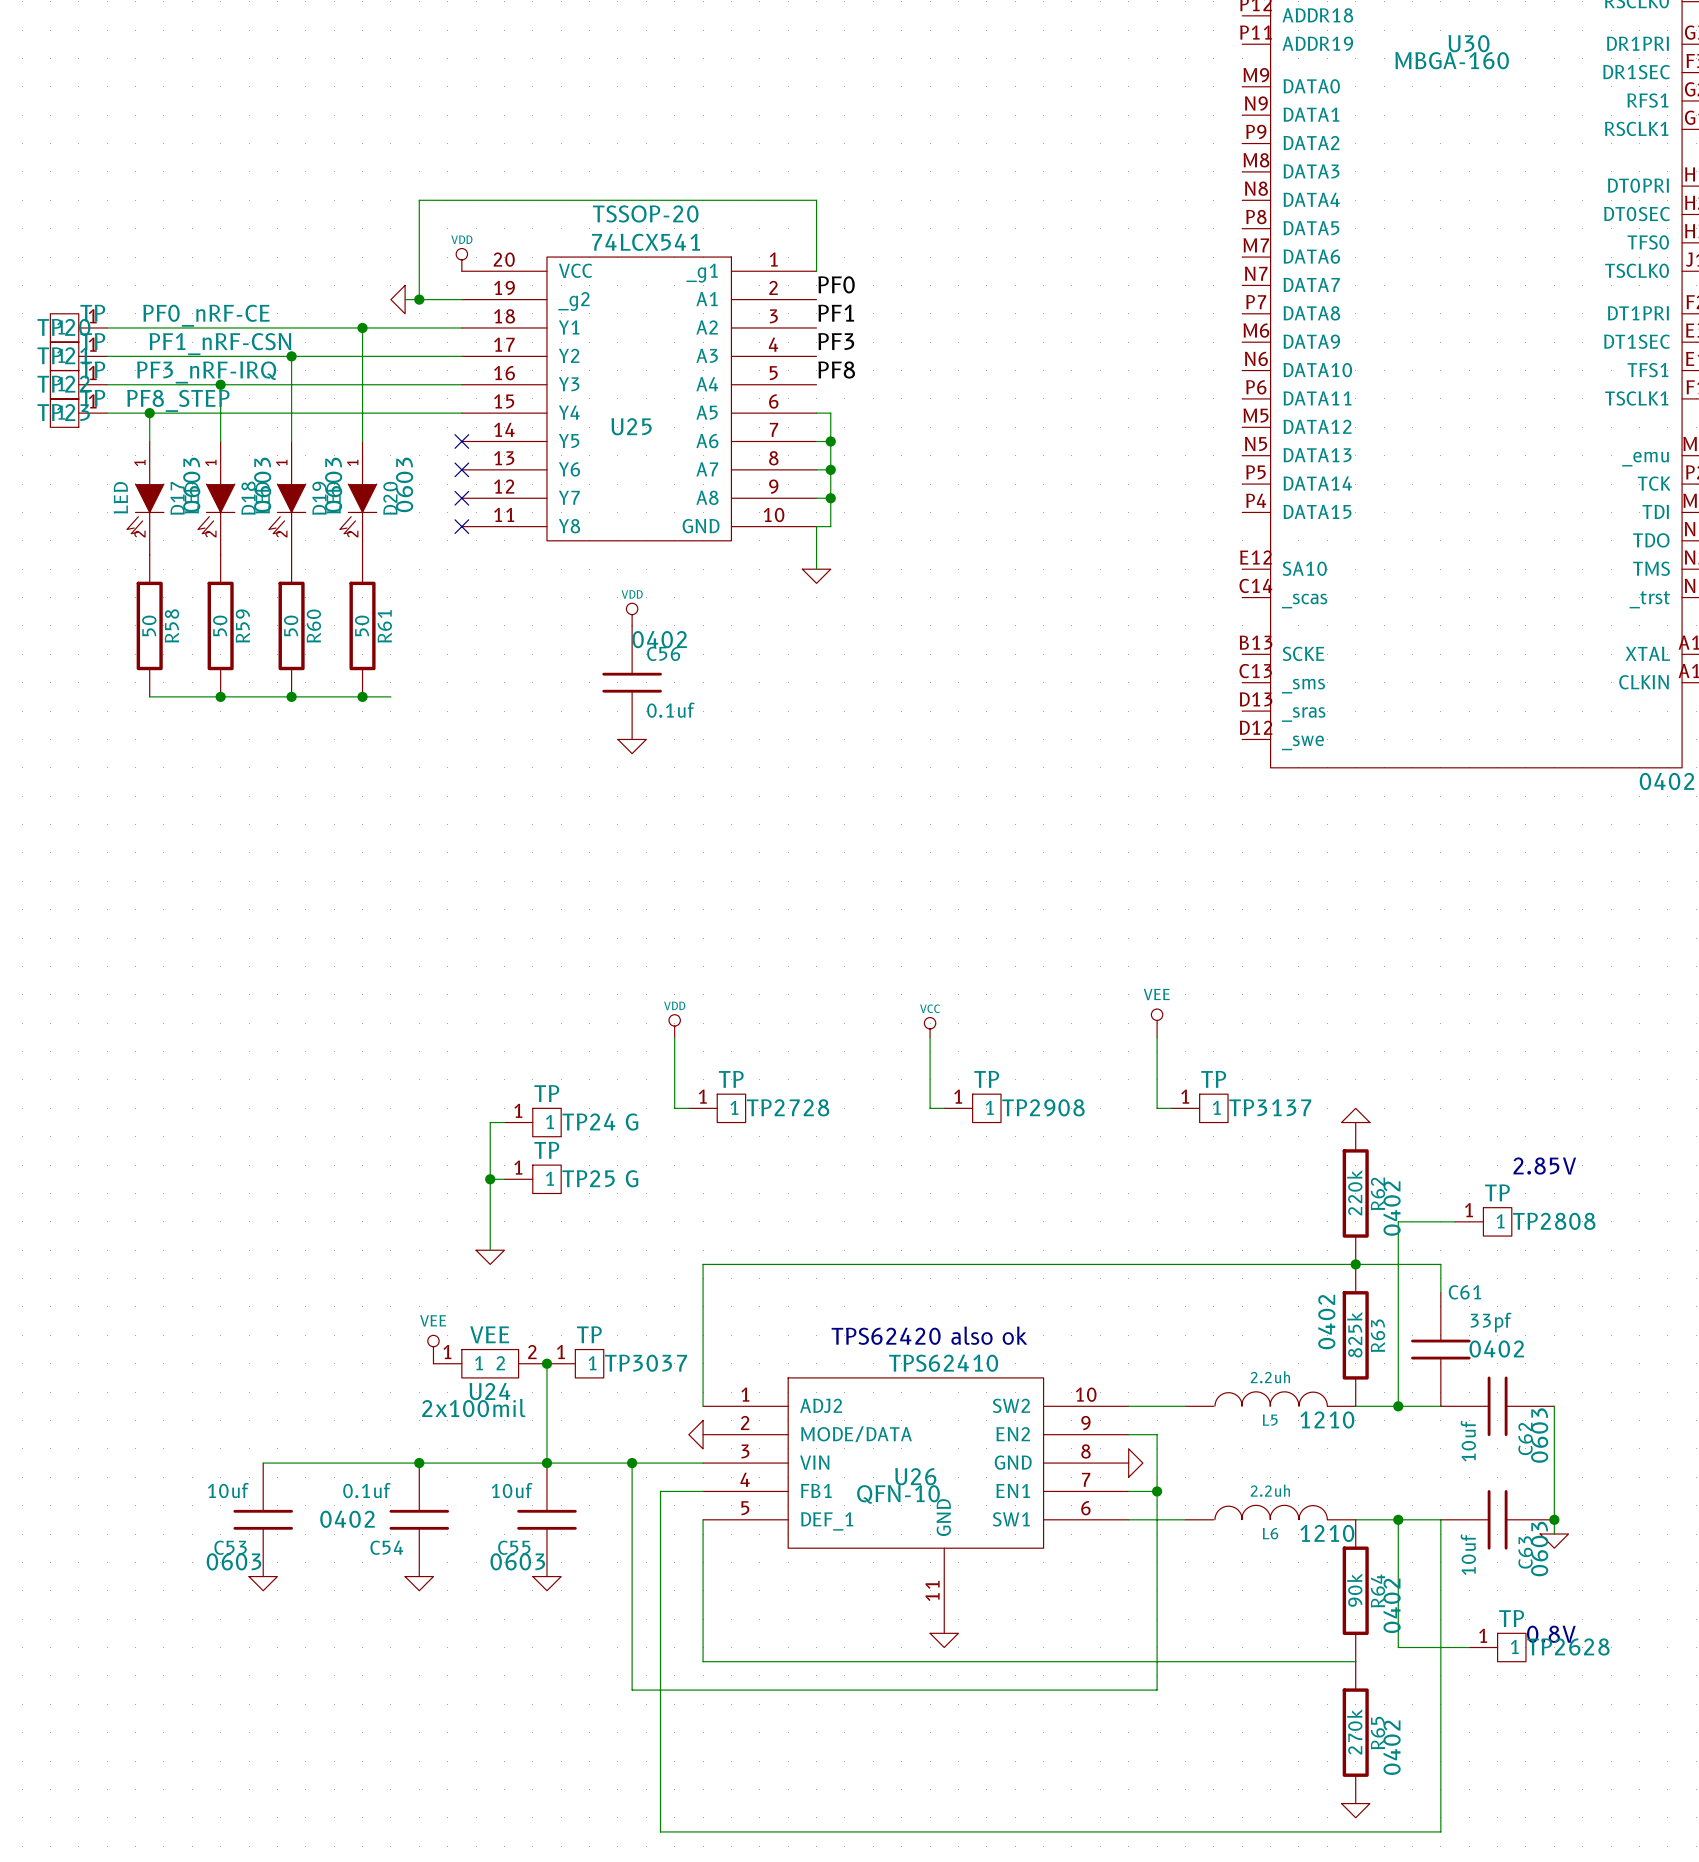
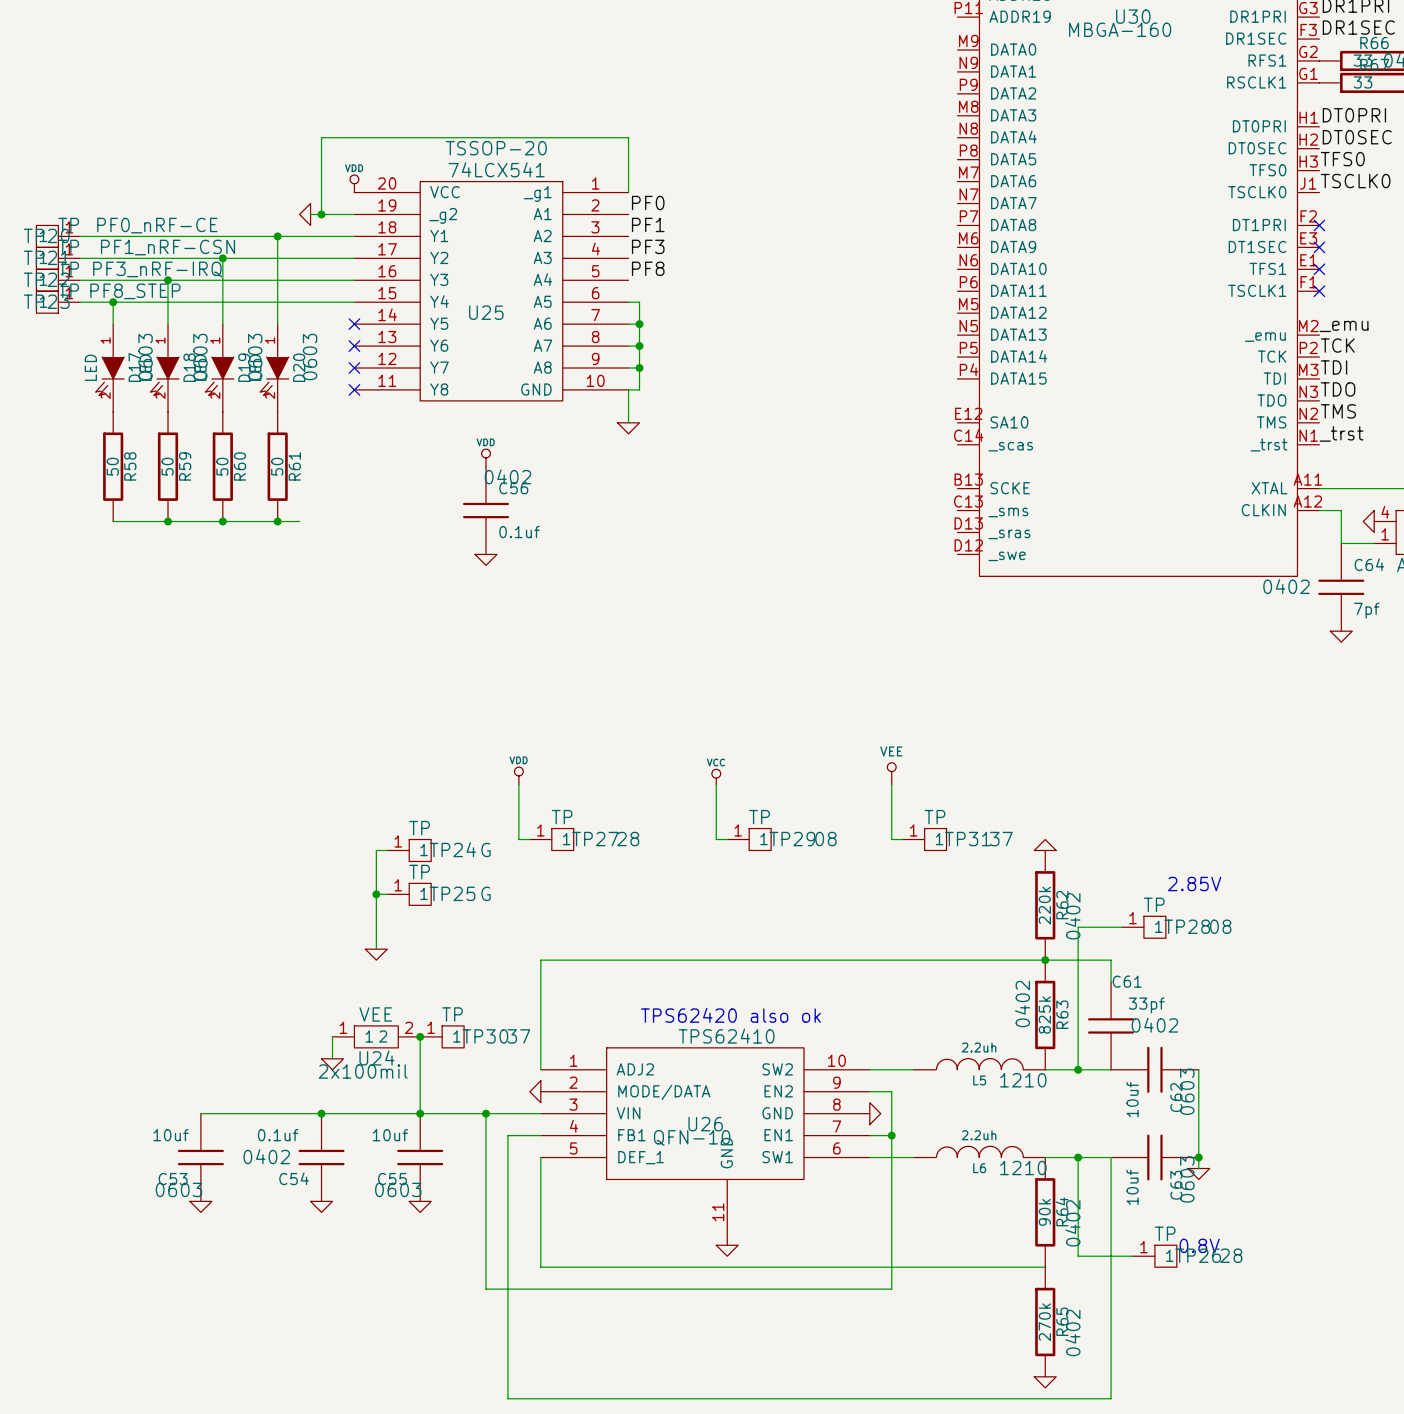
power symbol: VEE (433, 1349) -> none
wire: none -> (332, 1036) (332, 1058)
power symbol: none -> (332, 1064)

